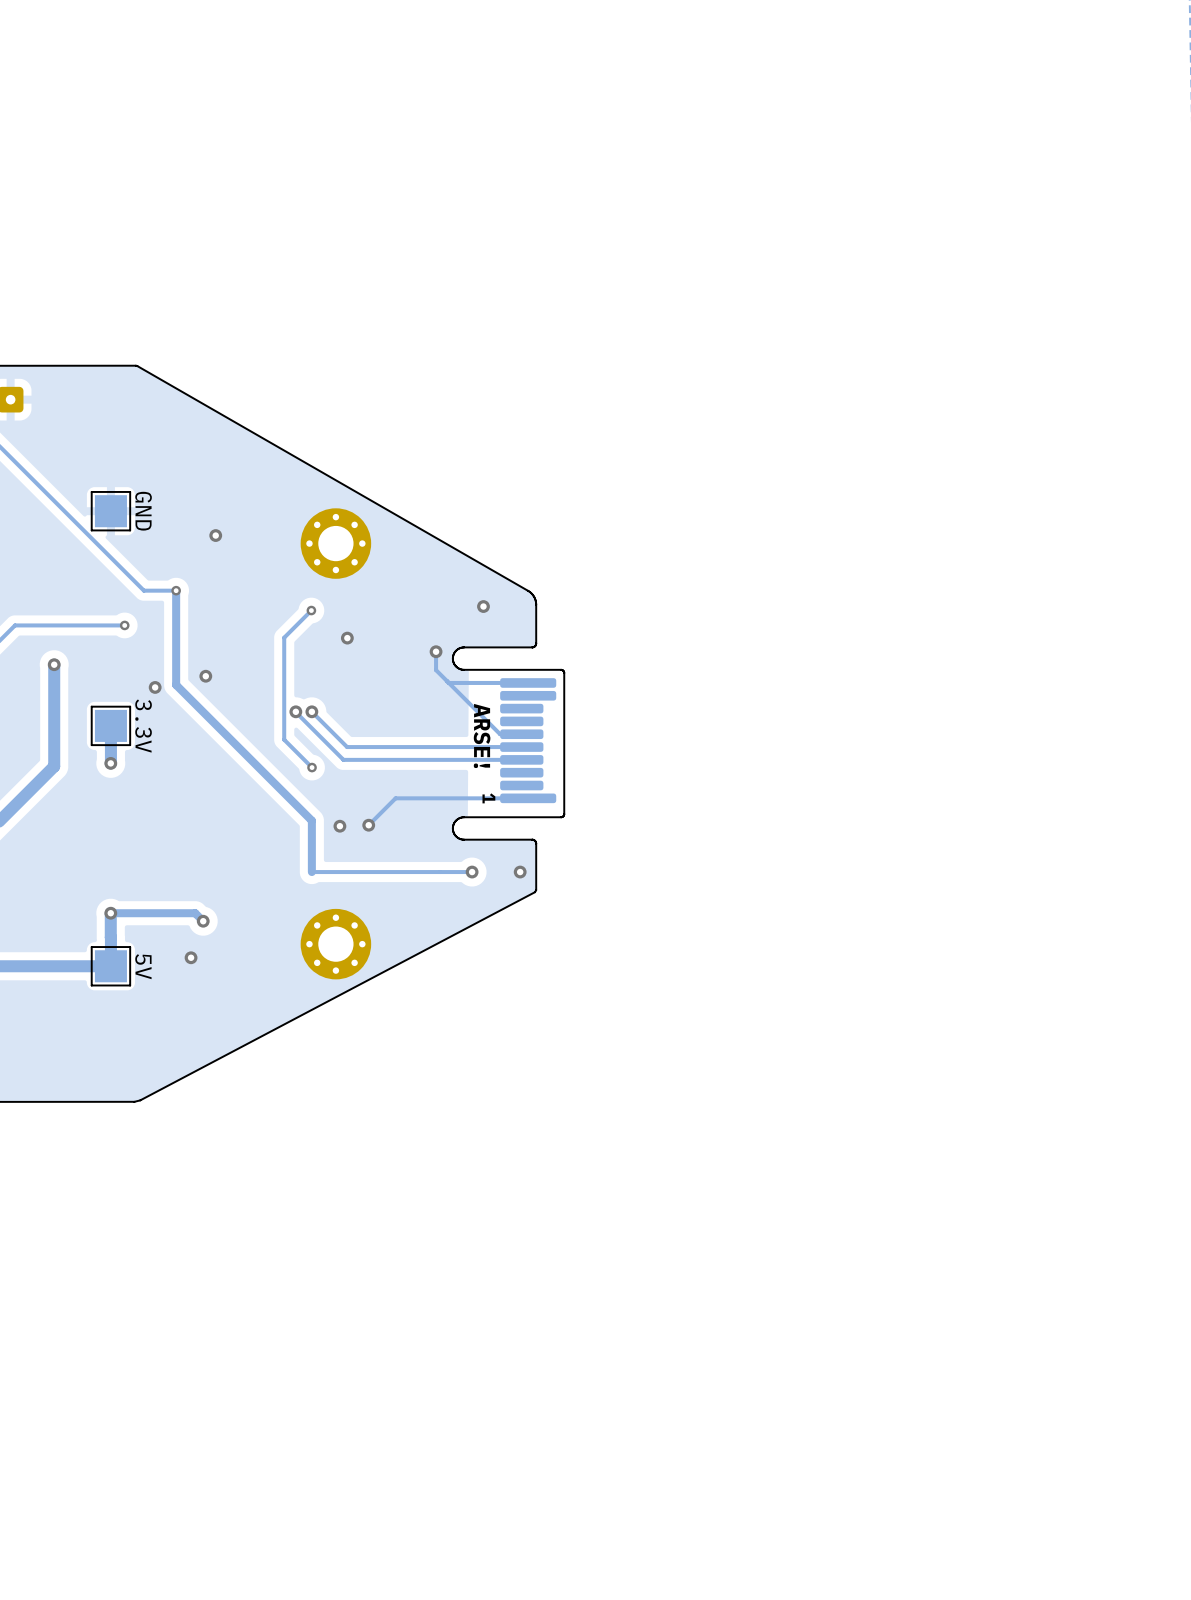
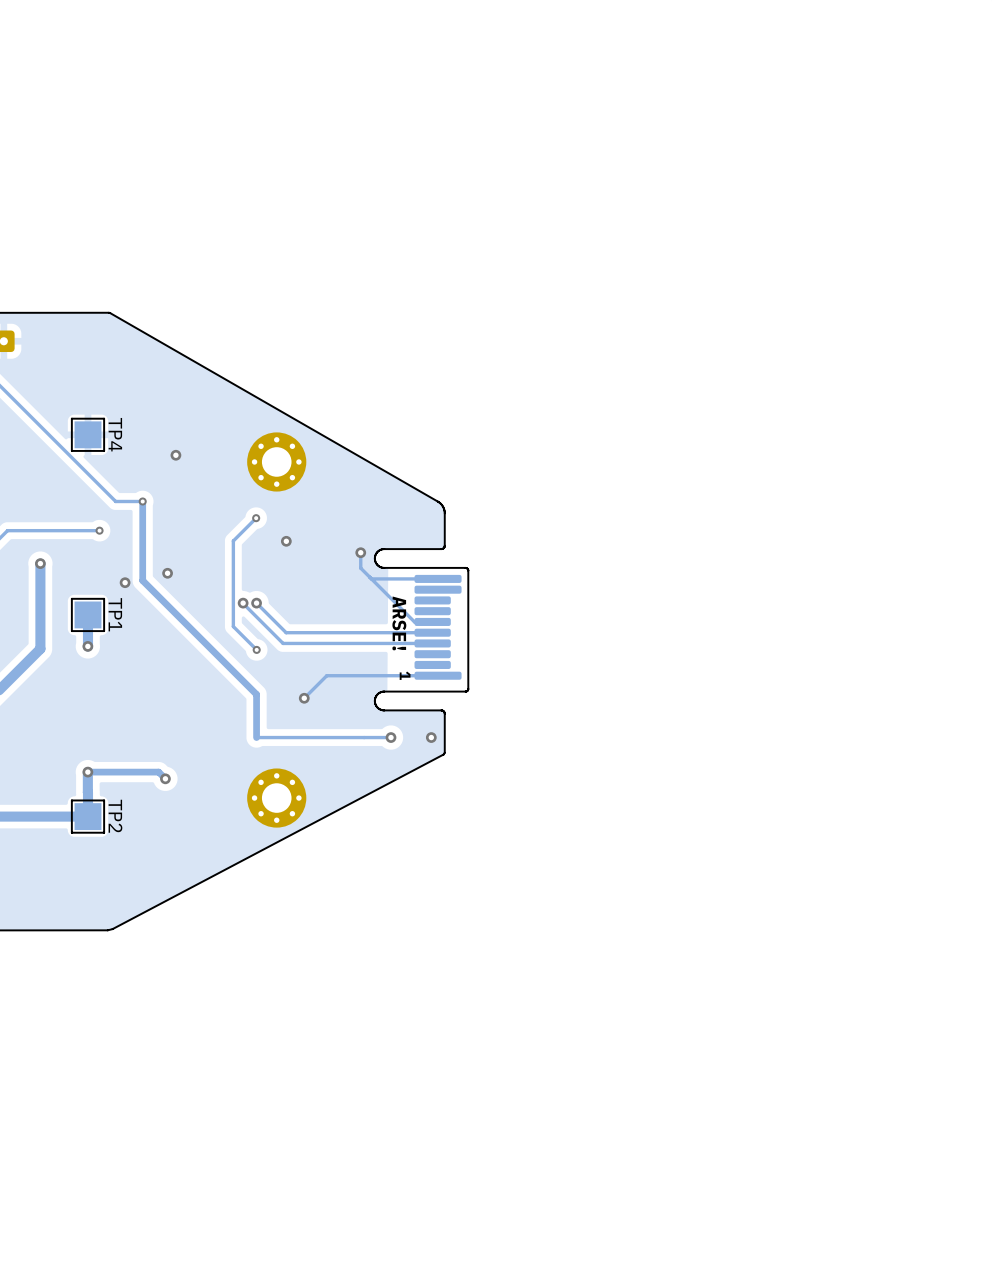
GND name: GND (143, 511) -> TP4 (115, 434)
via: (483, 606) -> none
3.3V name: 3.3V (143, 726) -> TP1 (115, 614)
via: (339, 826) -> none
via: (191, 957) -> none
5V name: 5V (143, 966) -> TP2 (115, 816)

